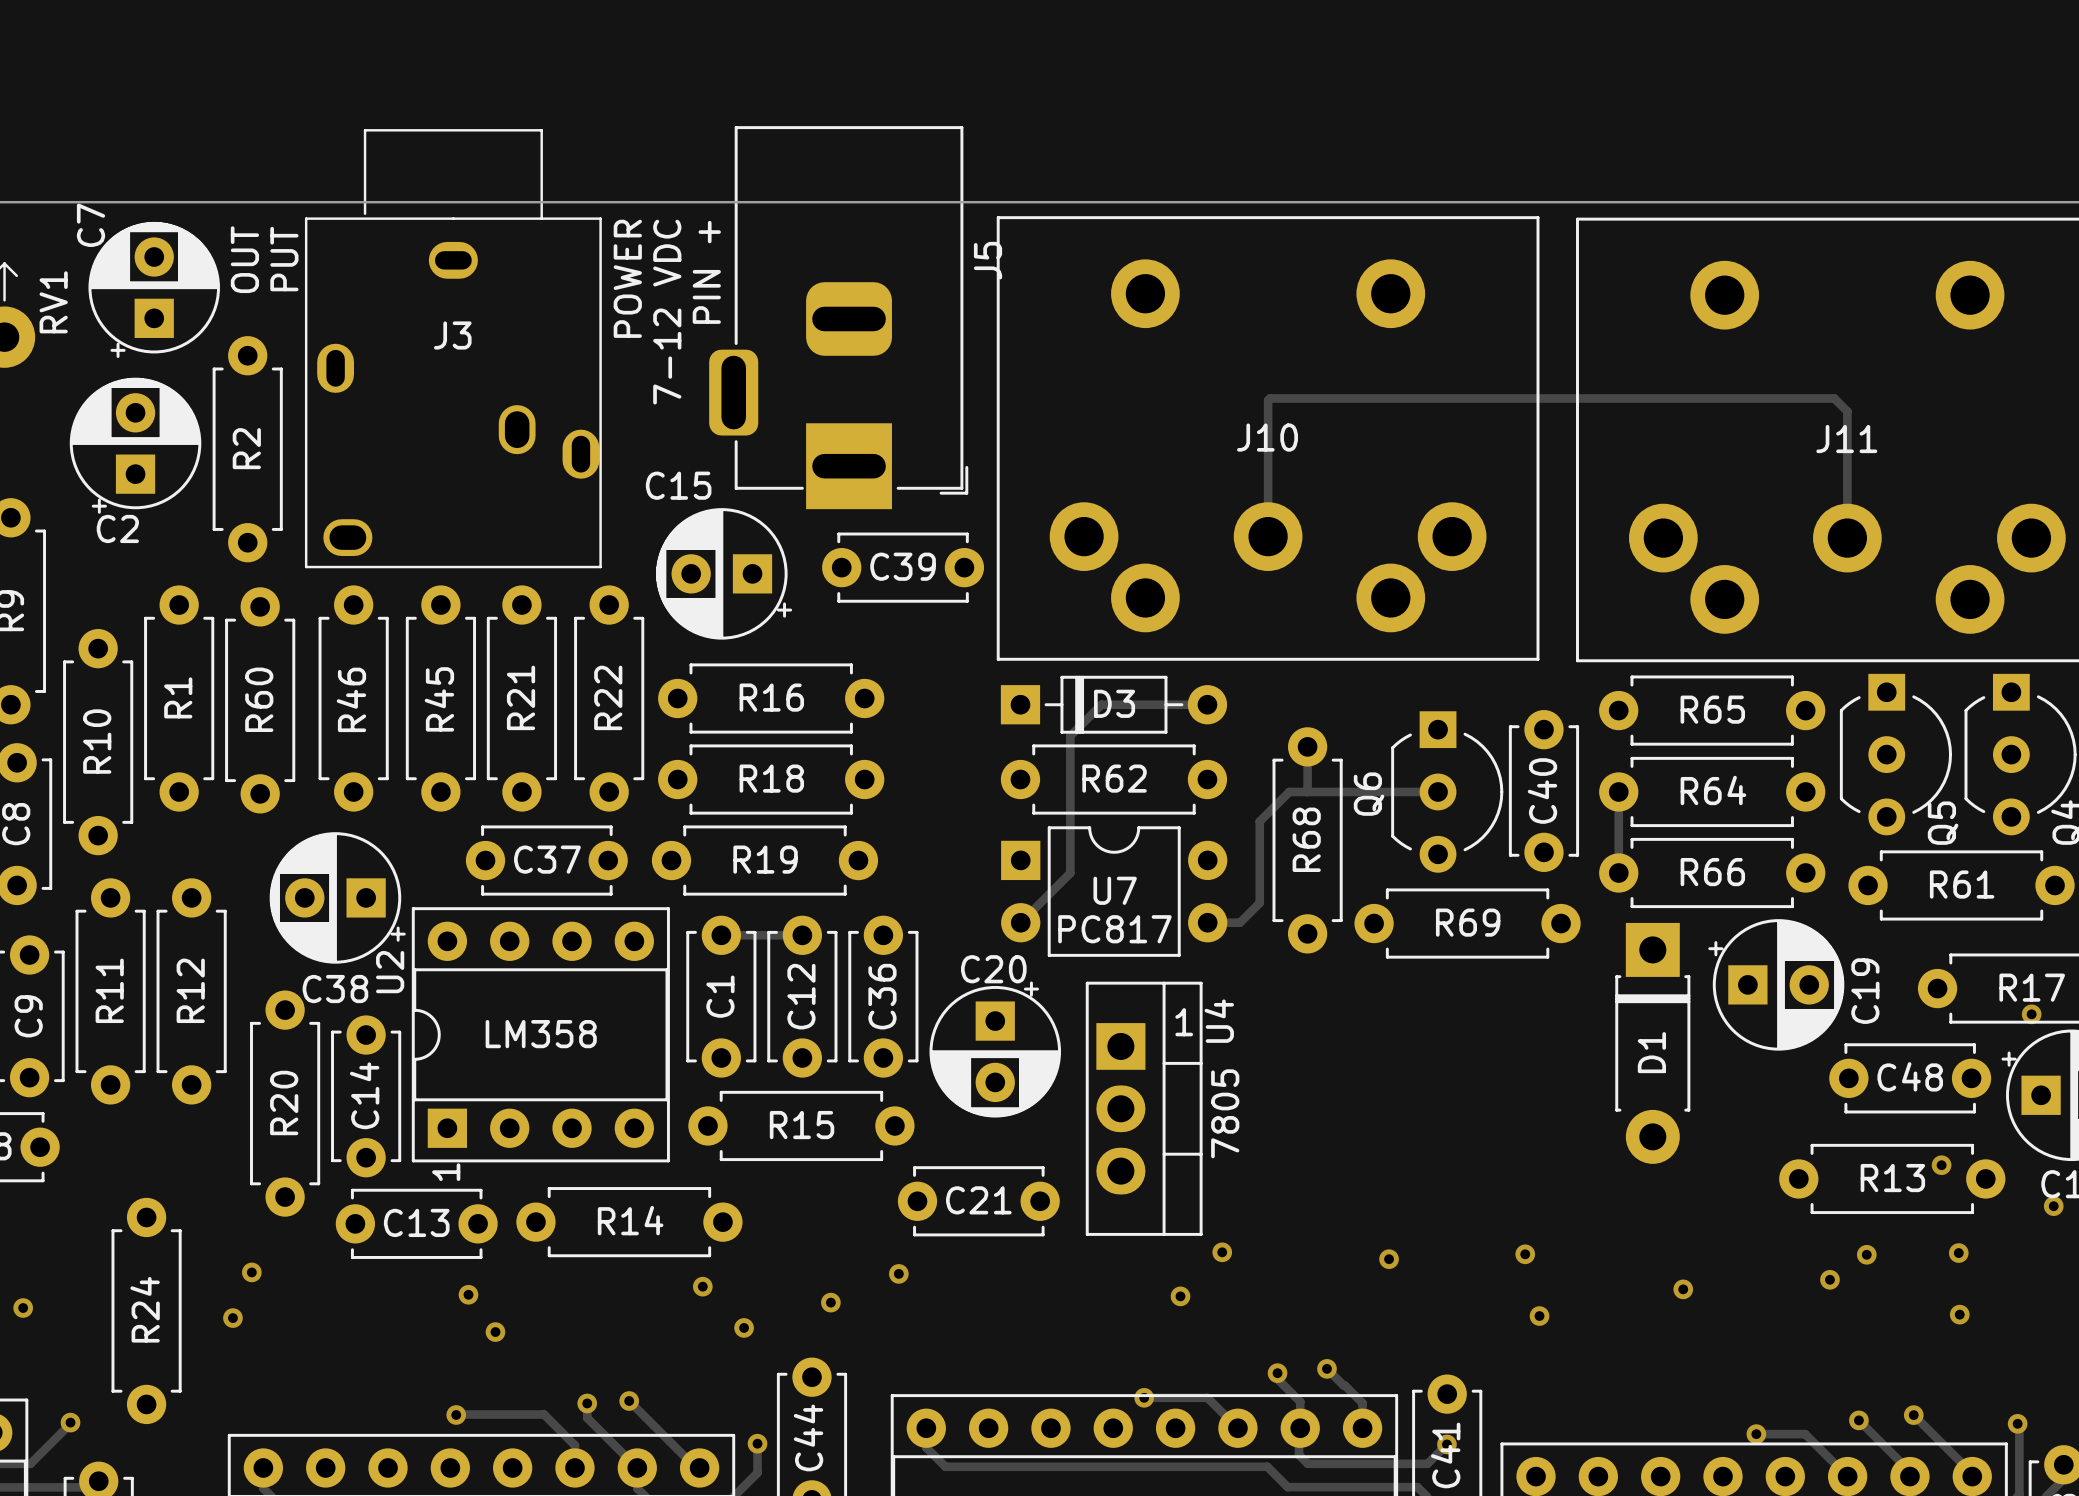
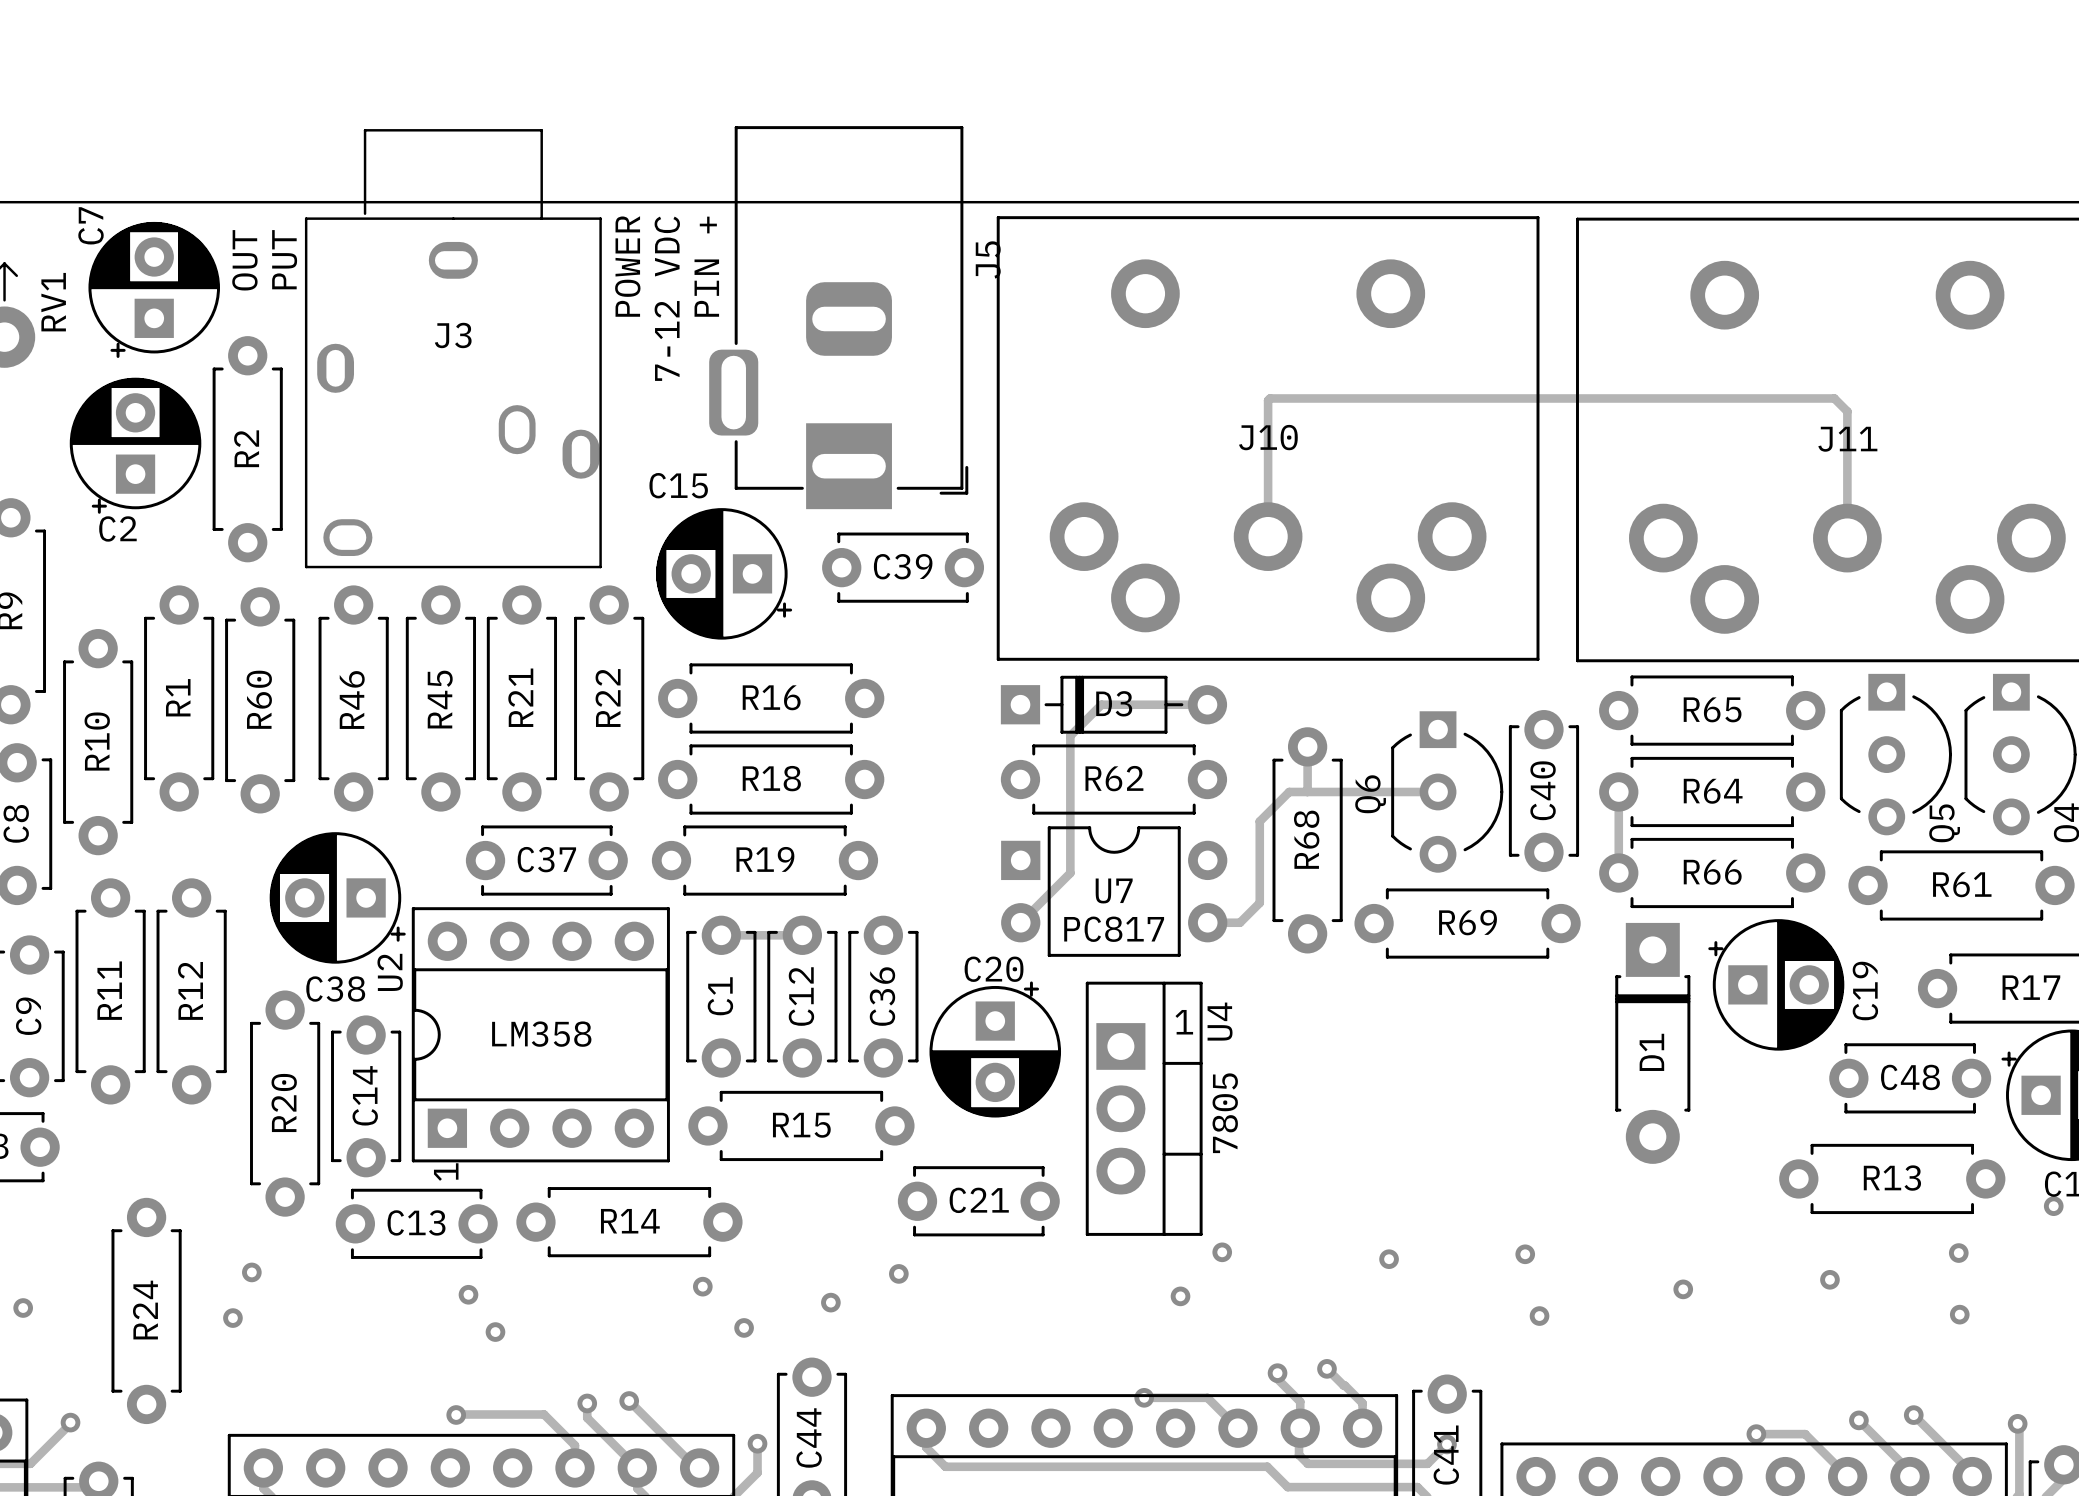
via: (2031, 1014) -> none
via: (1941, 1165) -> none
via: (1866, 1254) -> none

